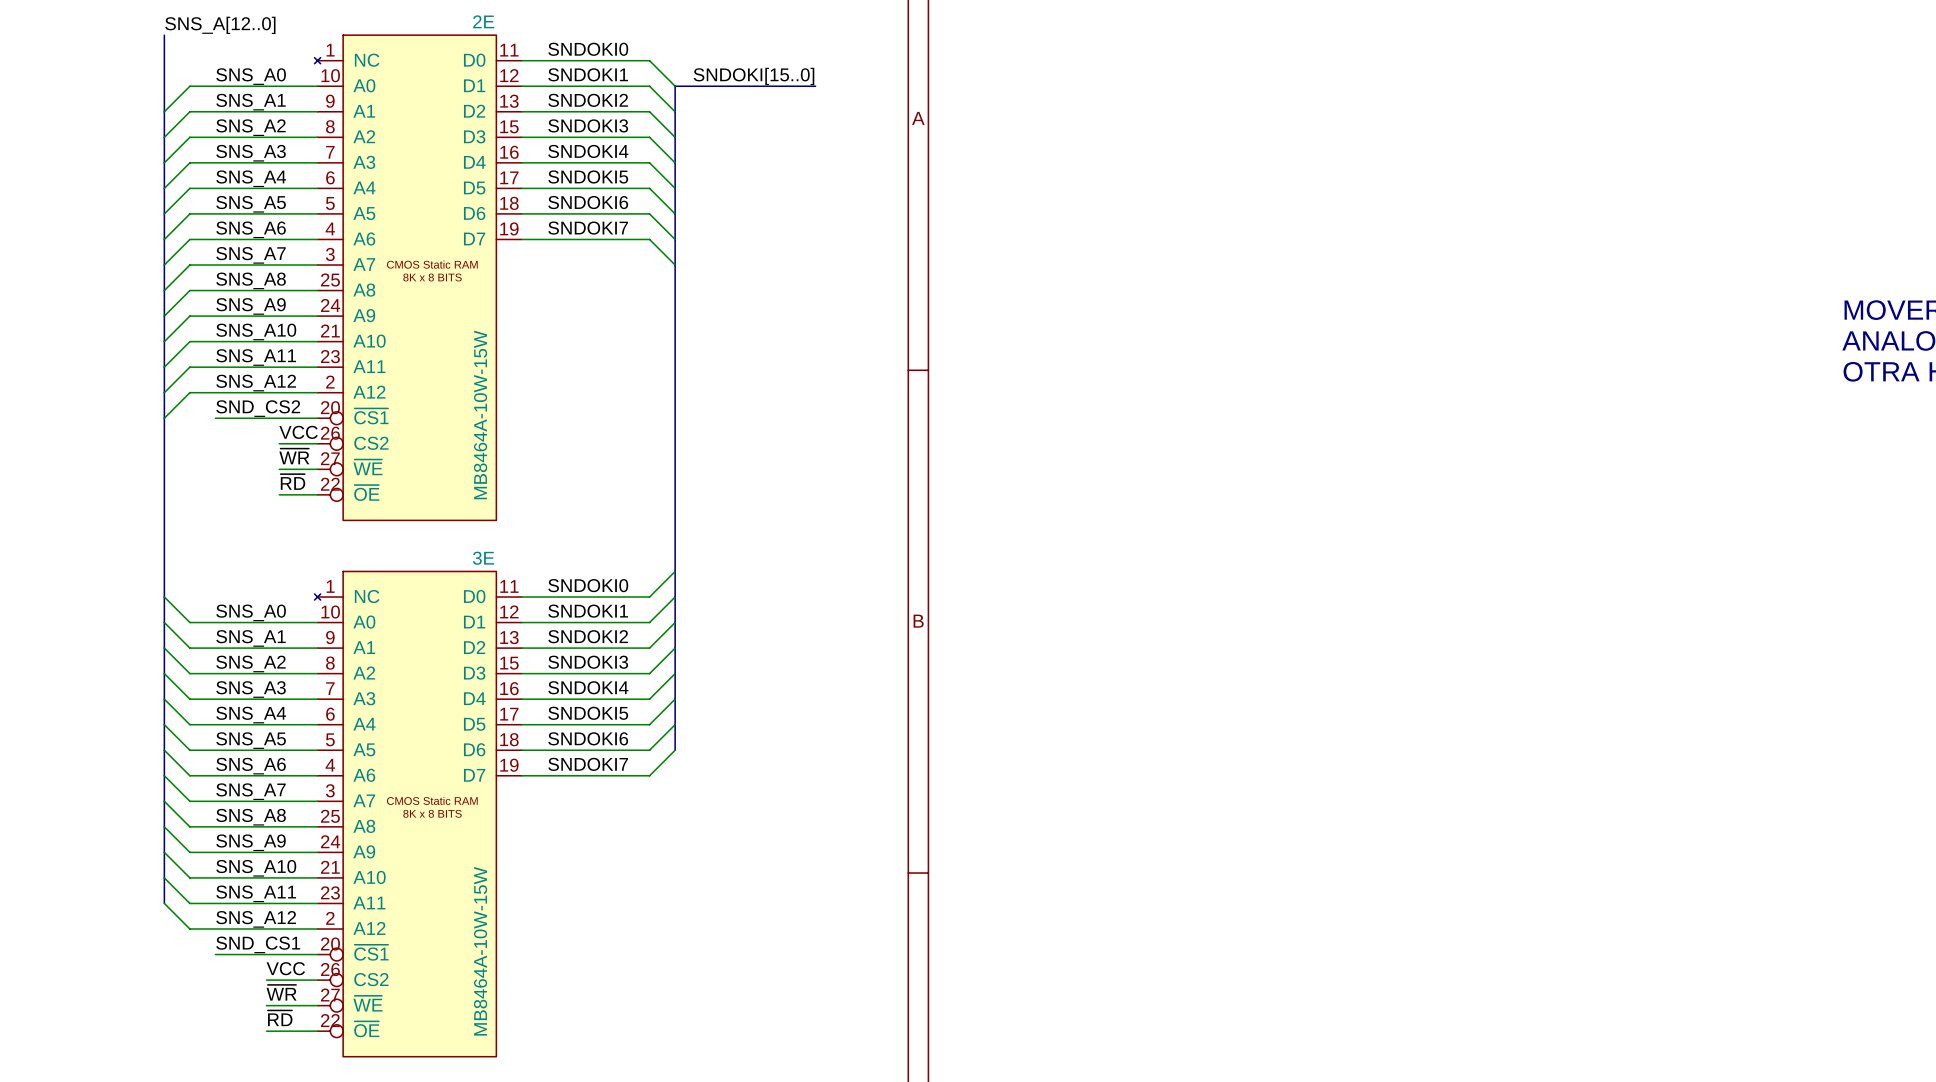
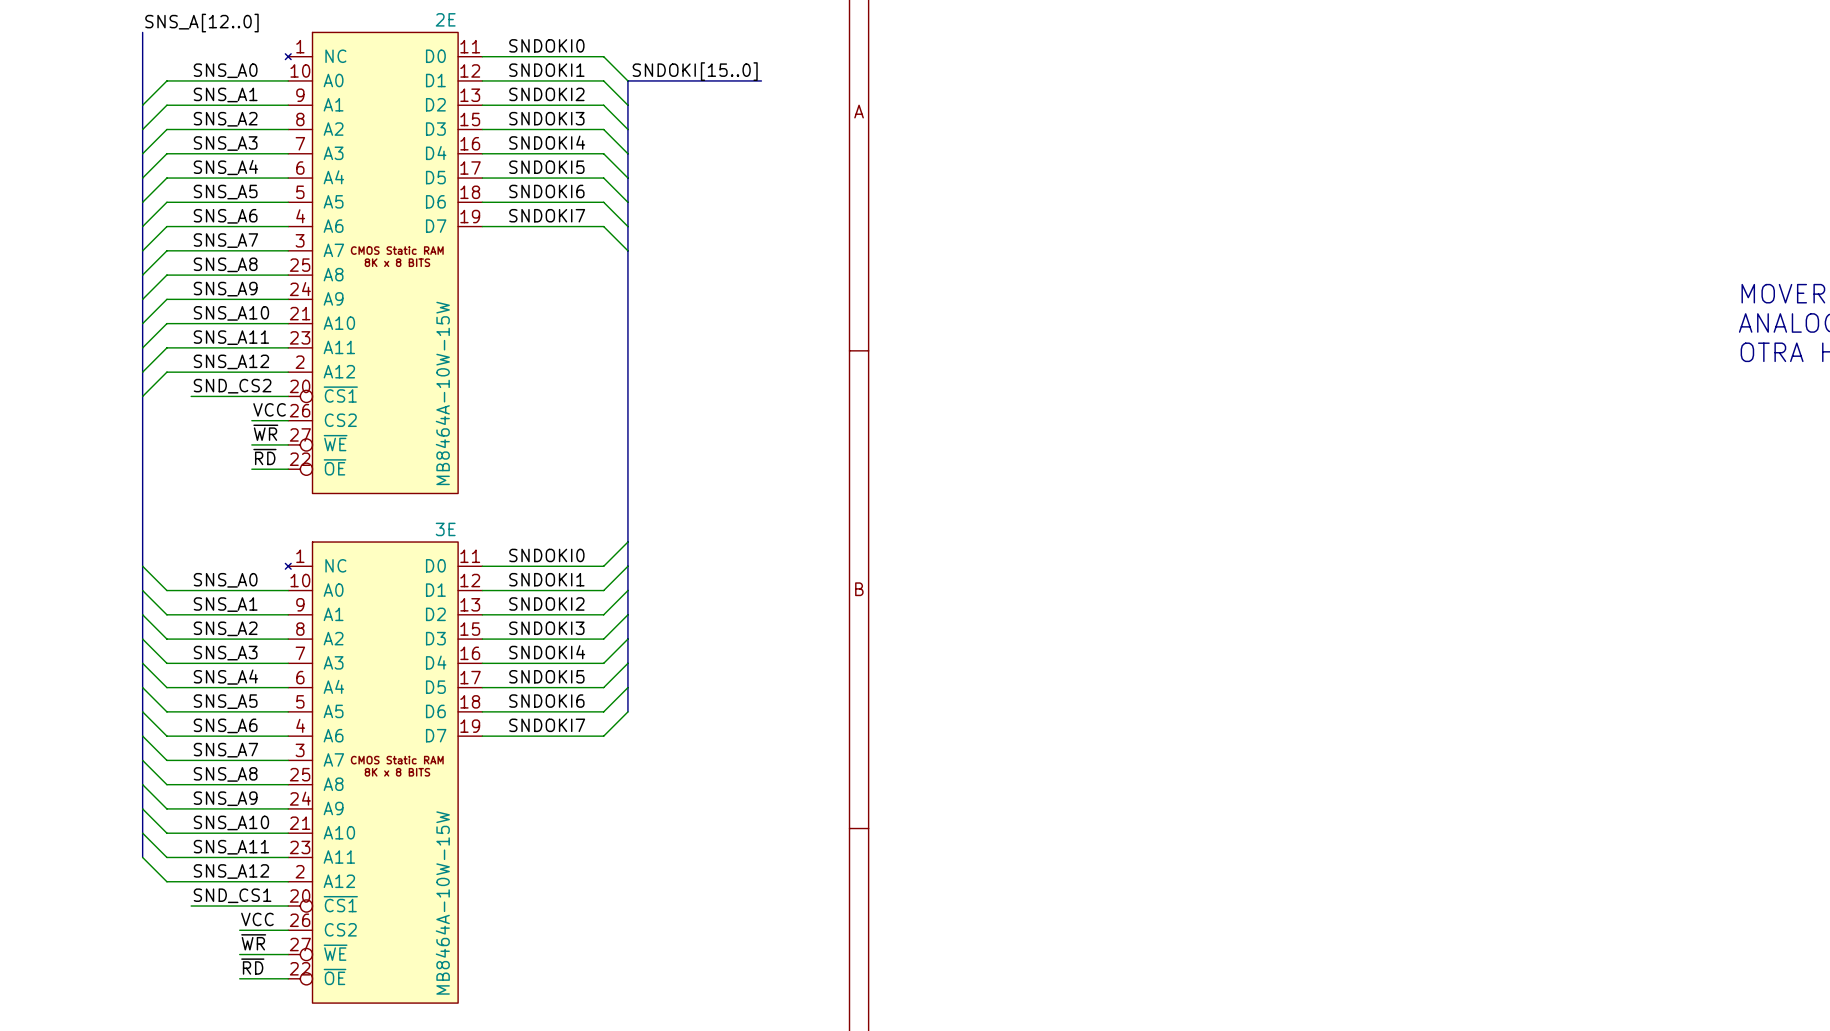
2E symbol: [314, 35, 522, 521] -> [285, 32, 483, 494]
3E symbol: [314, 571, 522, 1057] -> [285, 542, 483, 1004]

